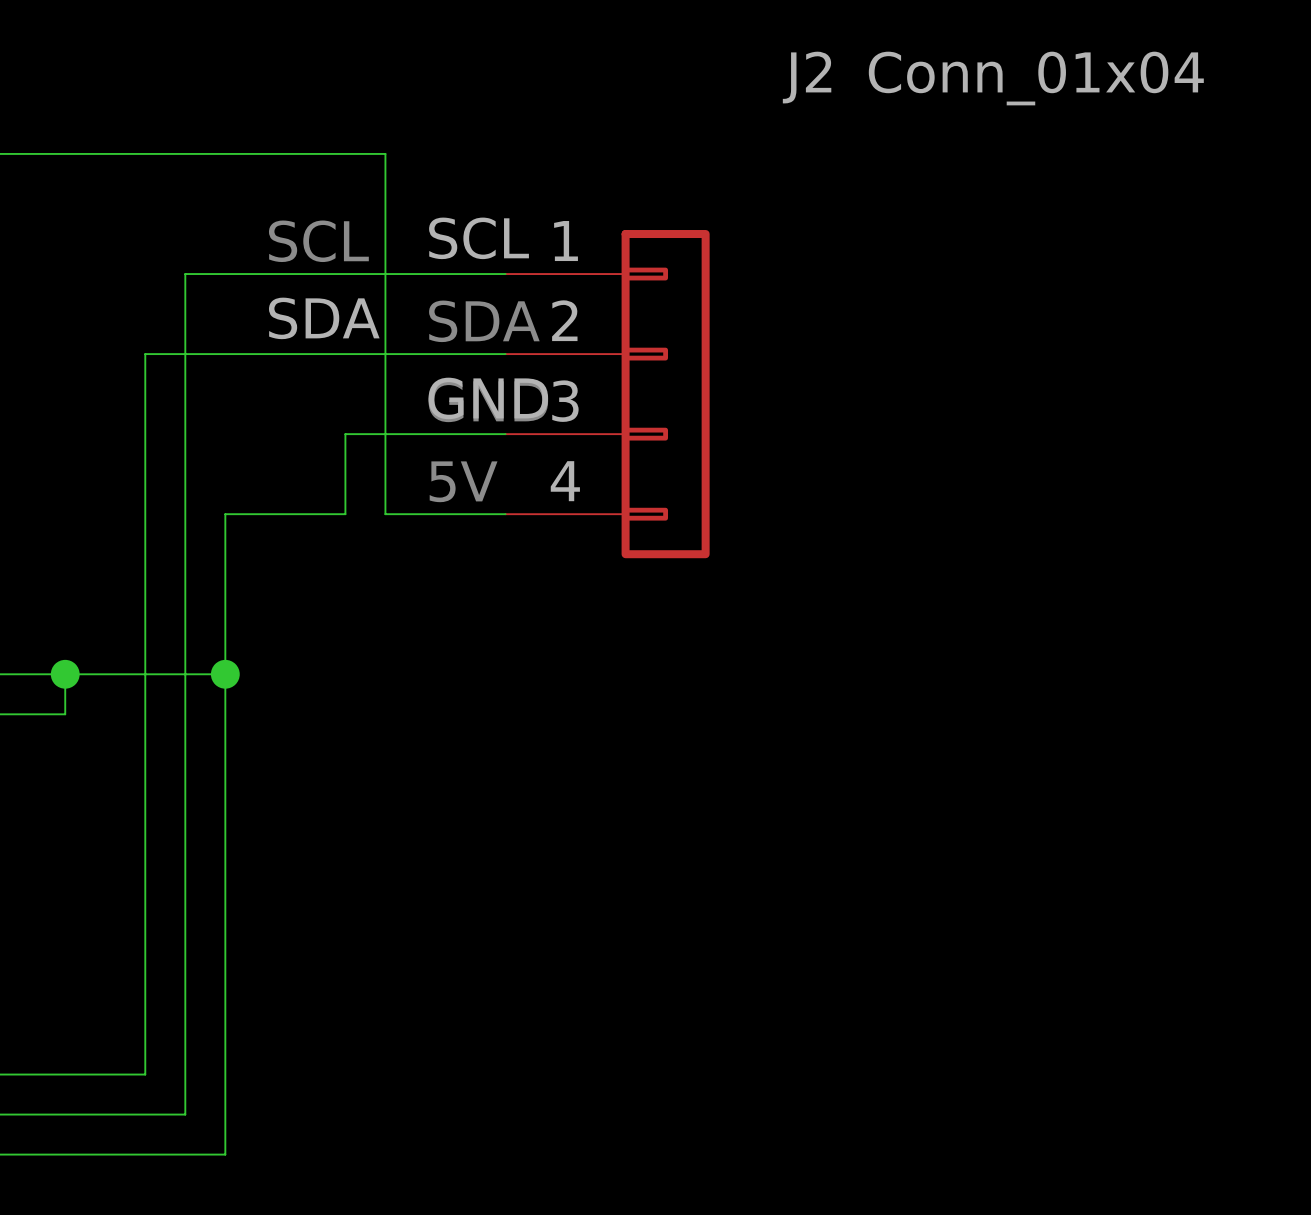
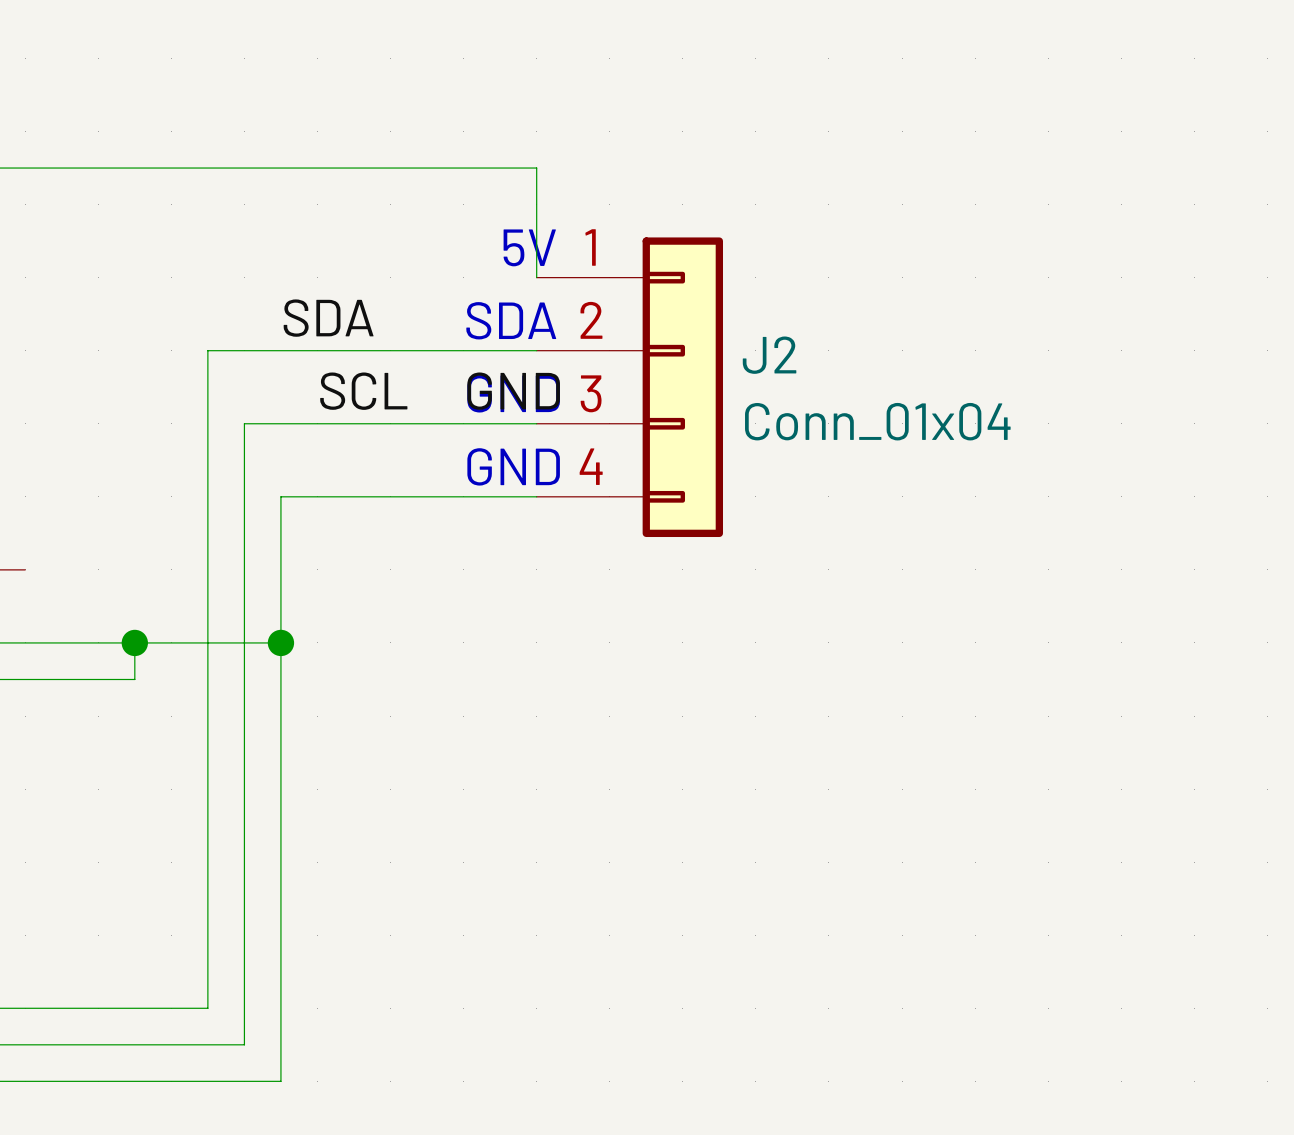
J2 name position: J2 (807, 77) -> J2 (769, 355)
J2 value position: Conn_01x04 (1036, 78) -> Conn_01x04 (877, 421)
wire: (385, 153) (385, 514) -> (427, 168) (536, 168) (536, 277)
label position: SCL (479, 238) -> SCL (363, 391)
text: SCL (318, 241) -> none
text: none -> 5V (529, 247)
wire: (505, 274) (185, 274) (185, 434) -> (390, 423) (244, 423)
label position: SDA (324, 318) -> SDA (328, 318)
wire: (345, 434) (345, 514) -> (427, 496) (390, 496)
text: 5V (463, 481) -> GND (513, 466)

